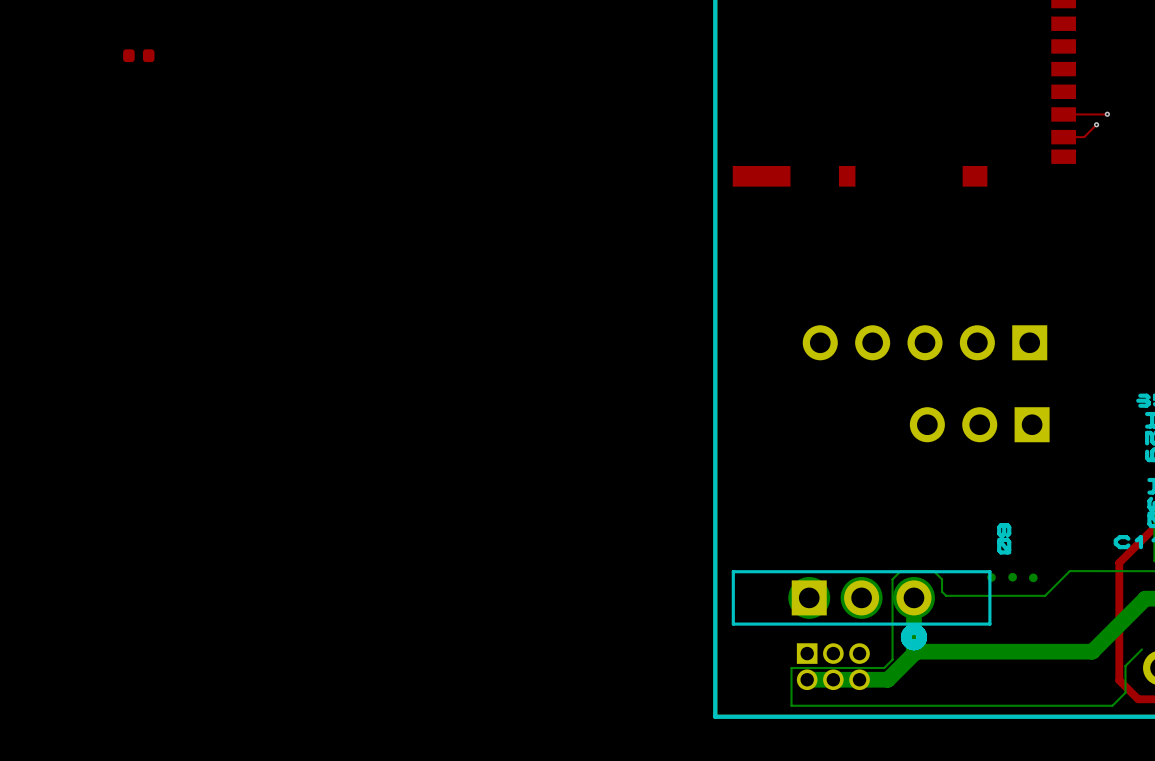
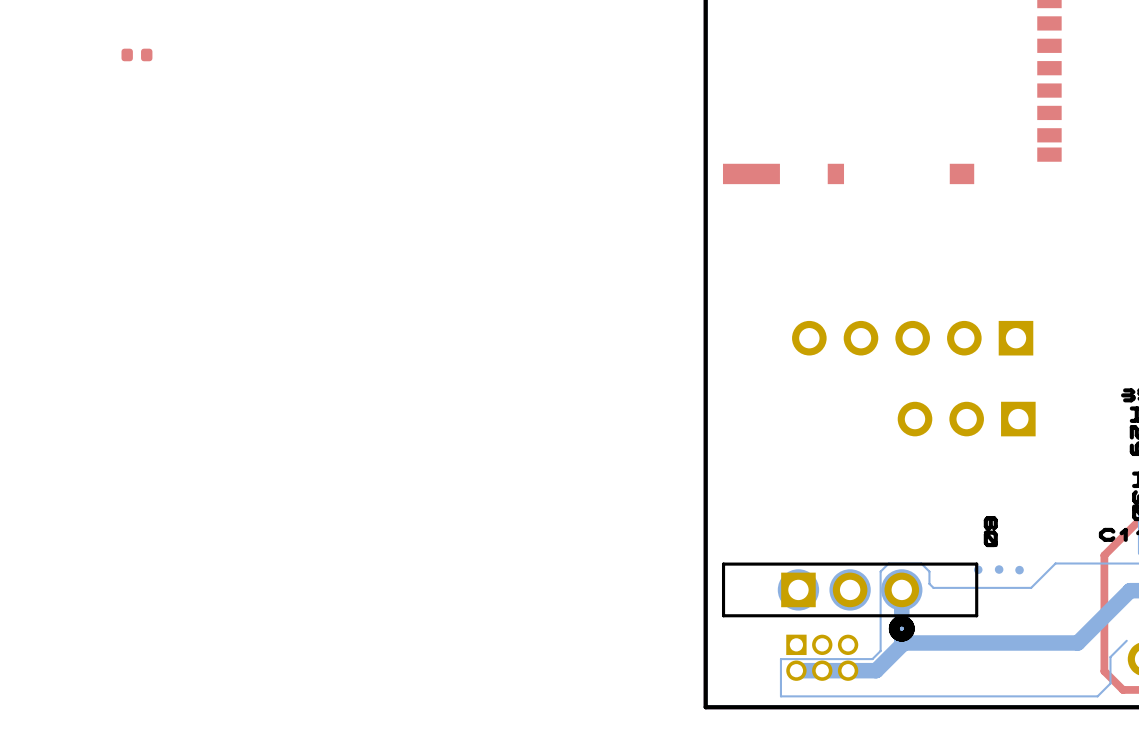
top track: (1107, 114) (1063, 114) -> none
via: (1107, 114) -> none
top track: (1096, 124) (1084, 137) (1063, 137) -> none
via: (1096, 124) -> none

